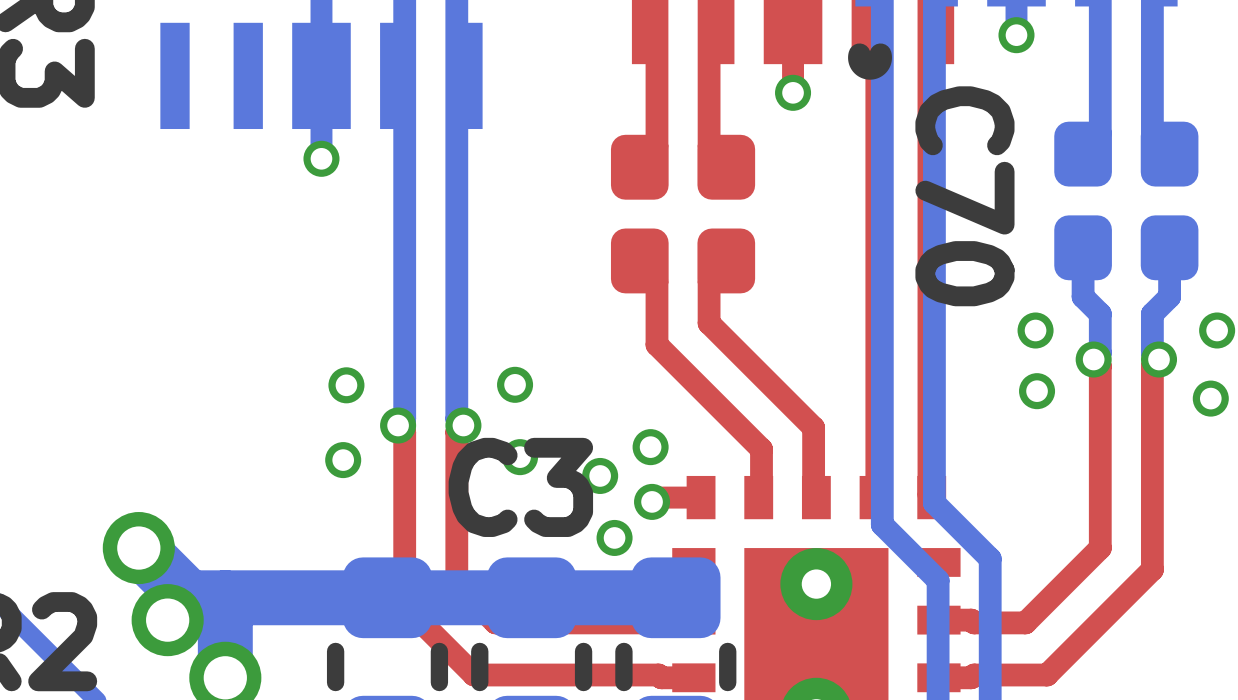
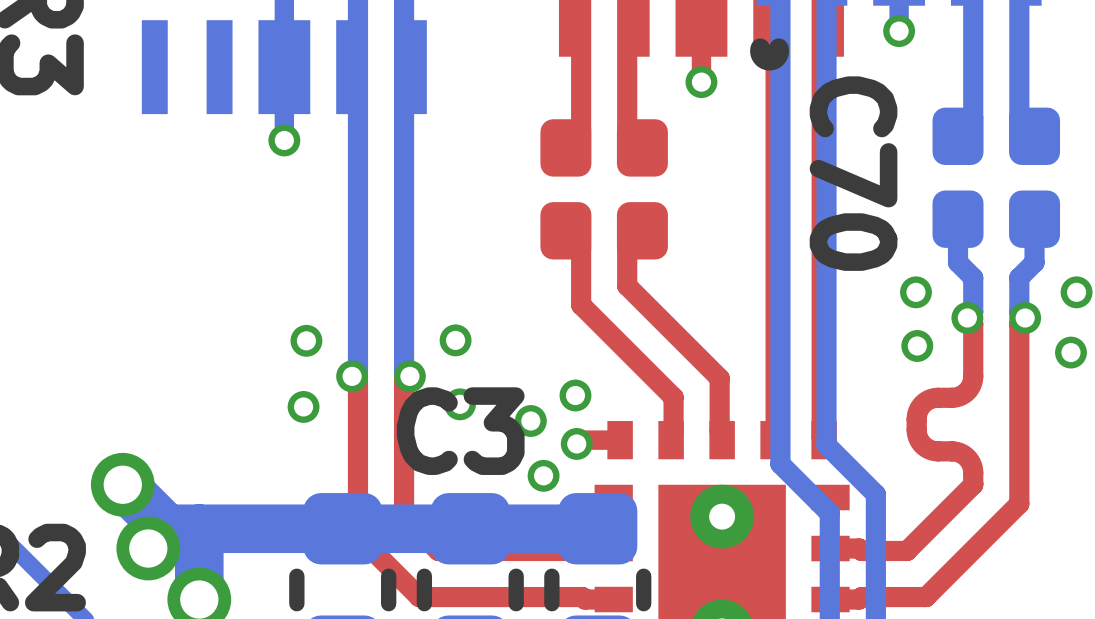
top track: (1100, 425) (1100, 534) -> (973, 376) (969, 387) (961, 395) (933, 398) (924, 402) (918, 409) (916, 419) (917, 434) (922, 445) (933, 450) (961, 453) (969, 461) (973, 472)

